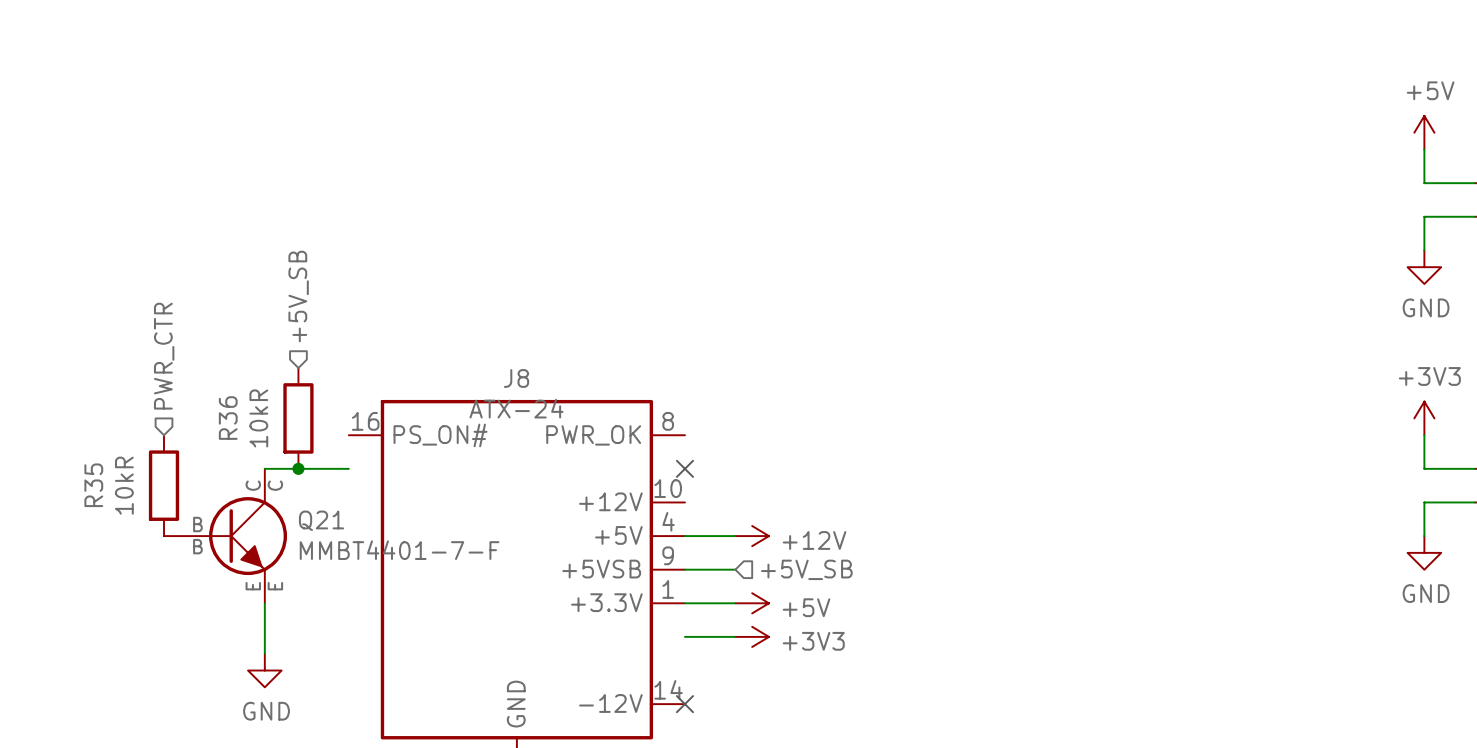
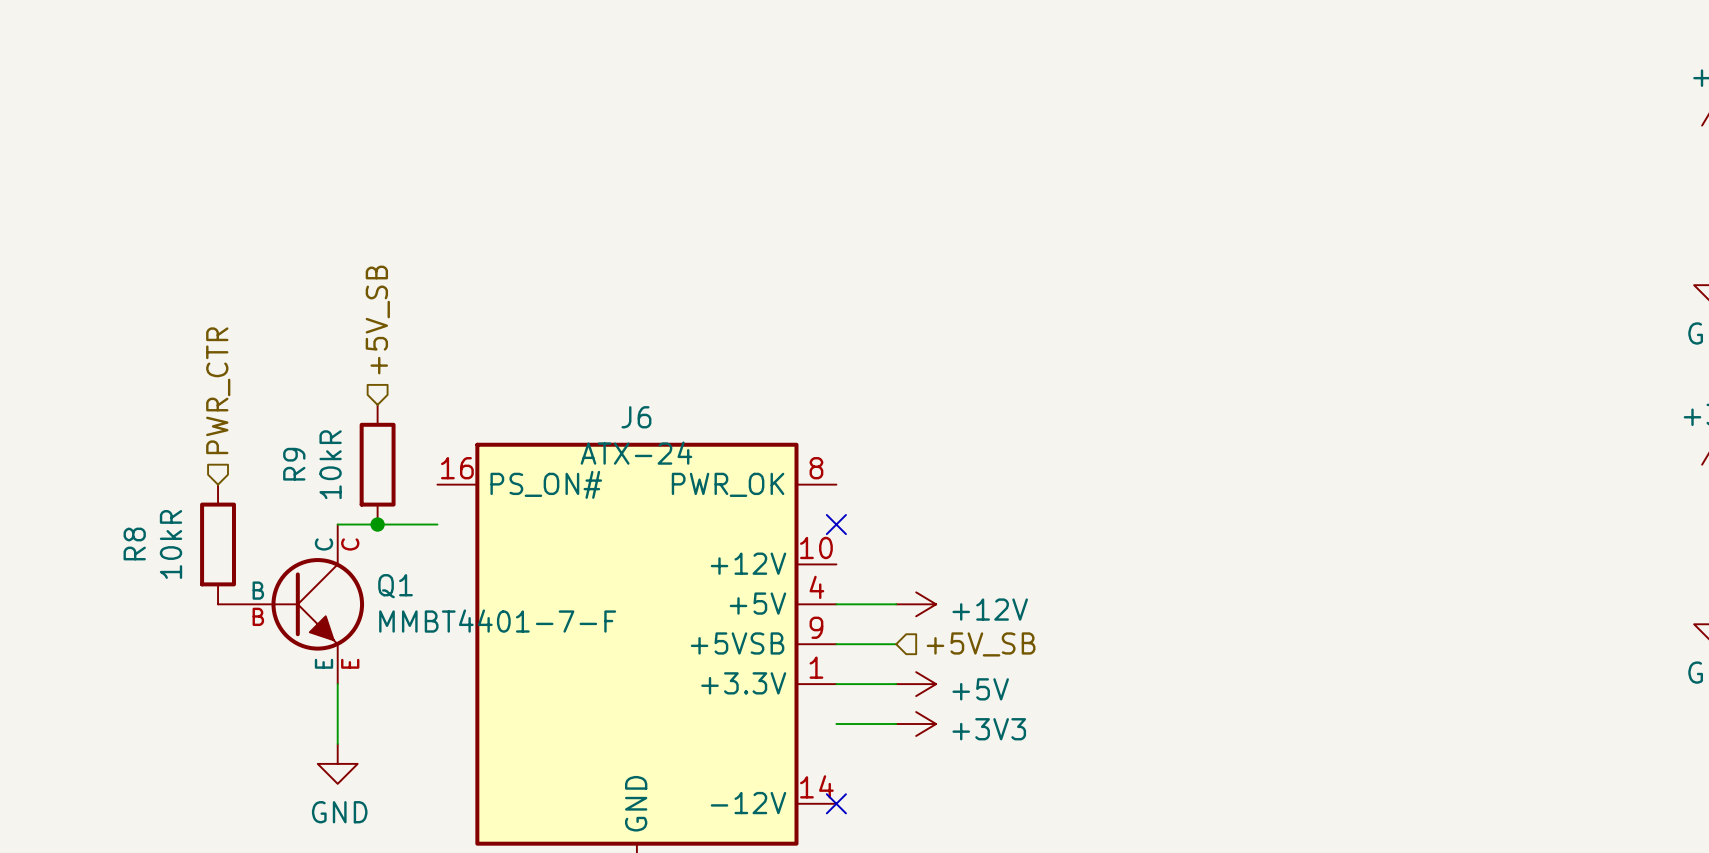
J8 name: J8 (516, 378) -> J6 (636, 417)
R36 name: R36 (228, 418) -> R9 (294, 464)
R35 name: R35 (93, 485) -> R8 (134, 544)
Q21 name: Q21 (321, 520) -> Q1 (395, 586)

